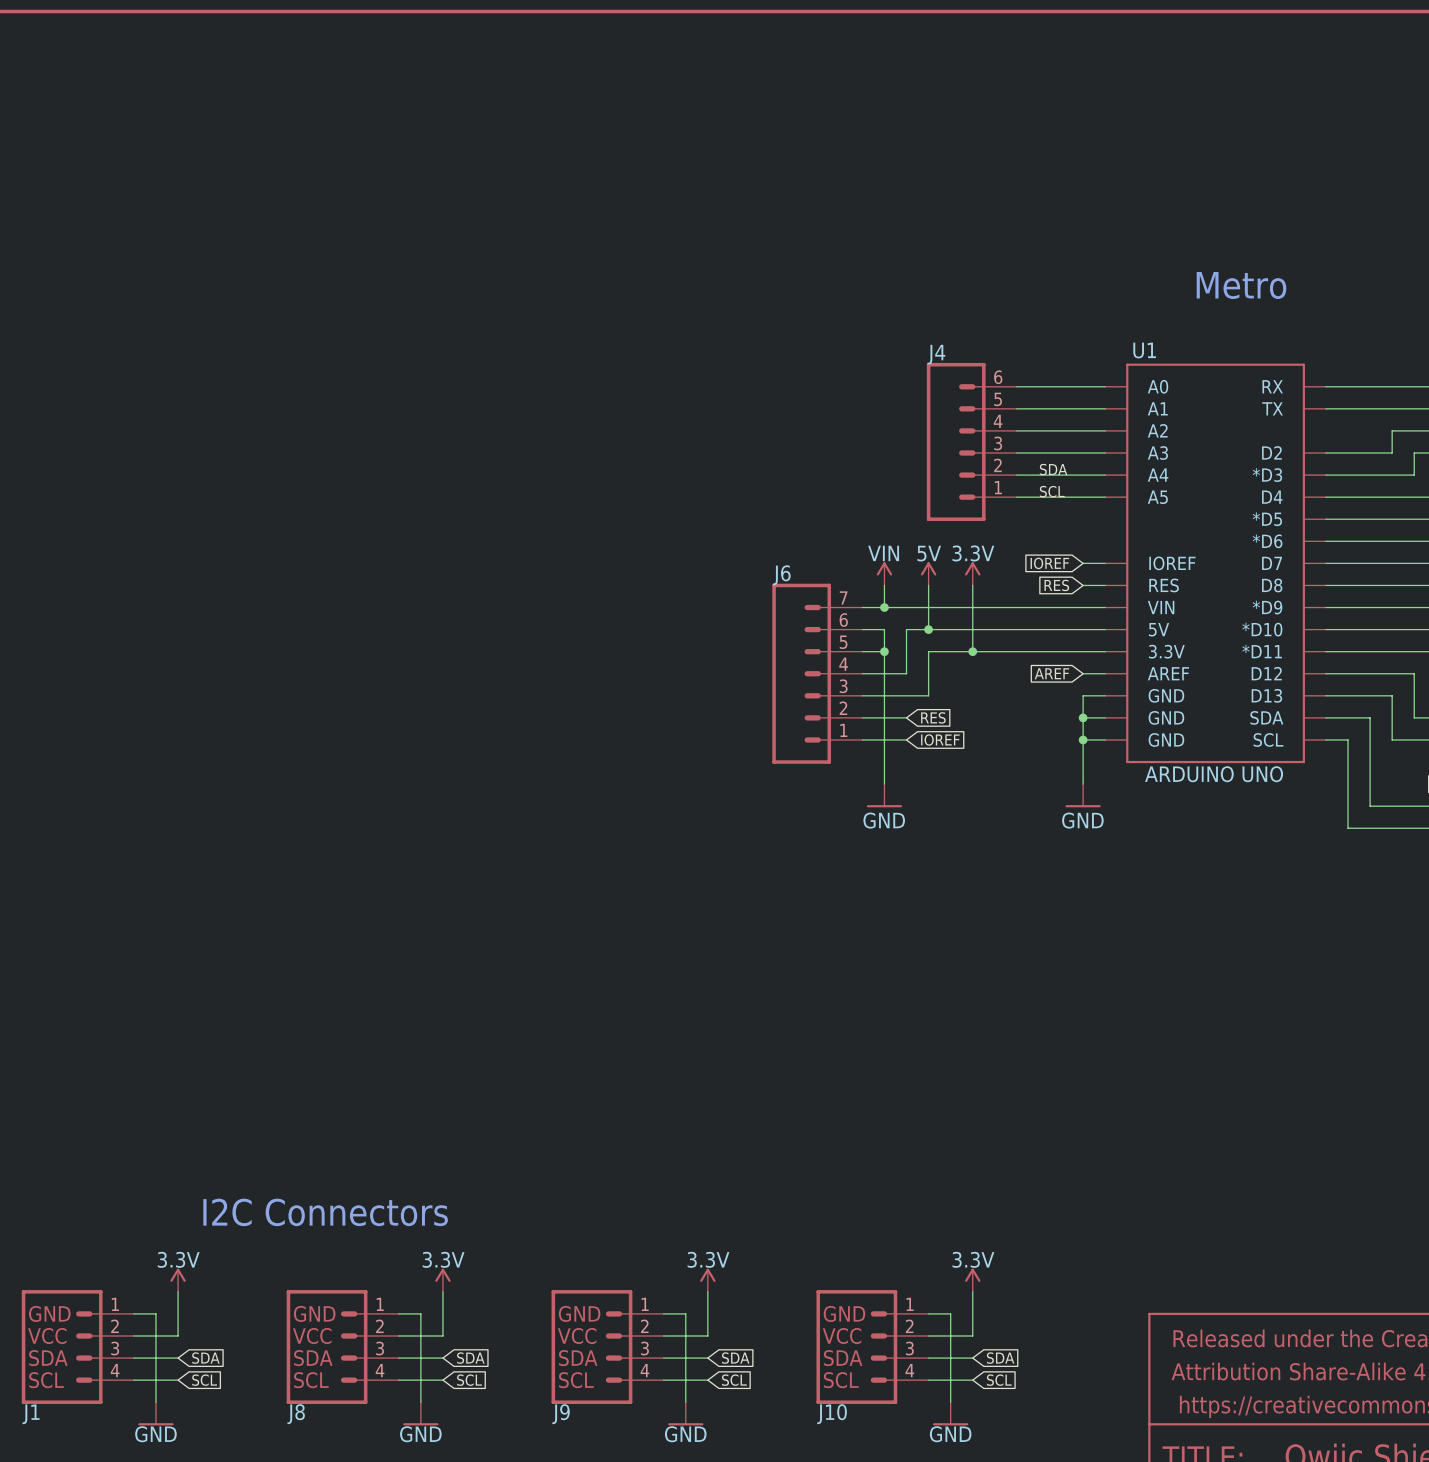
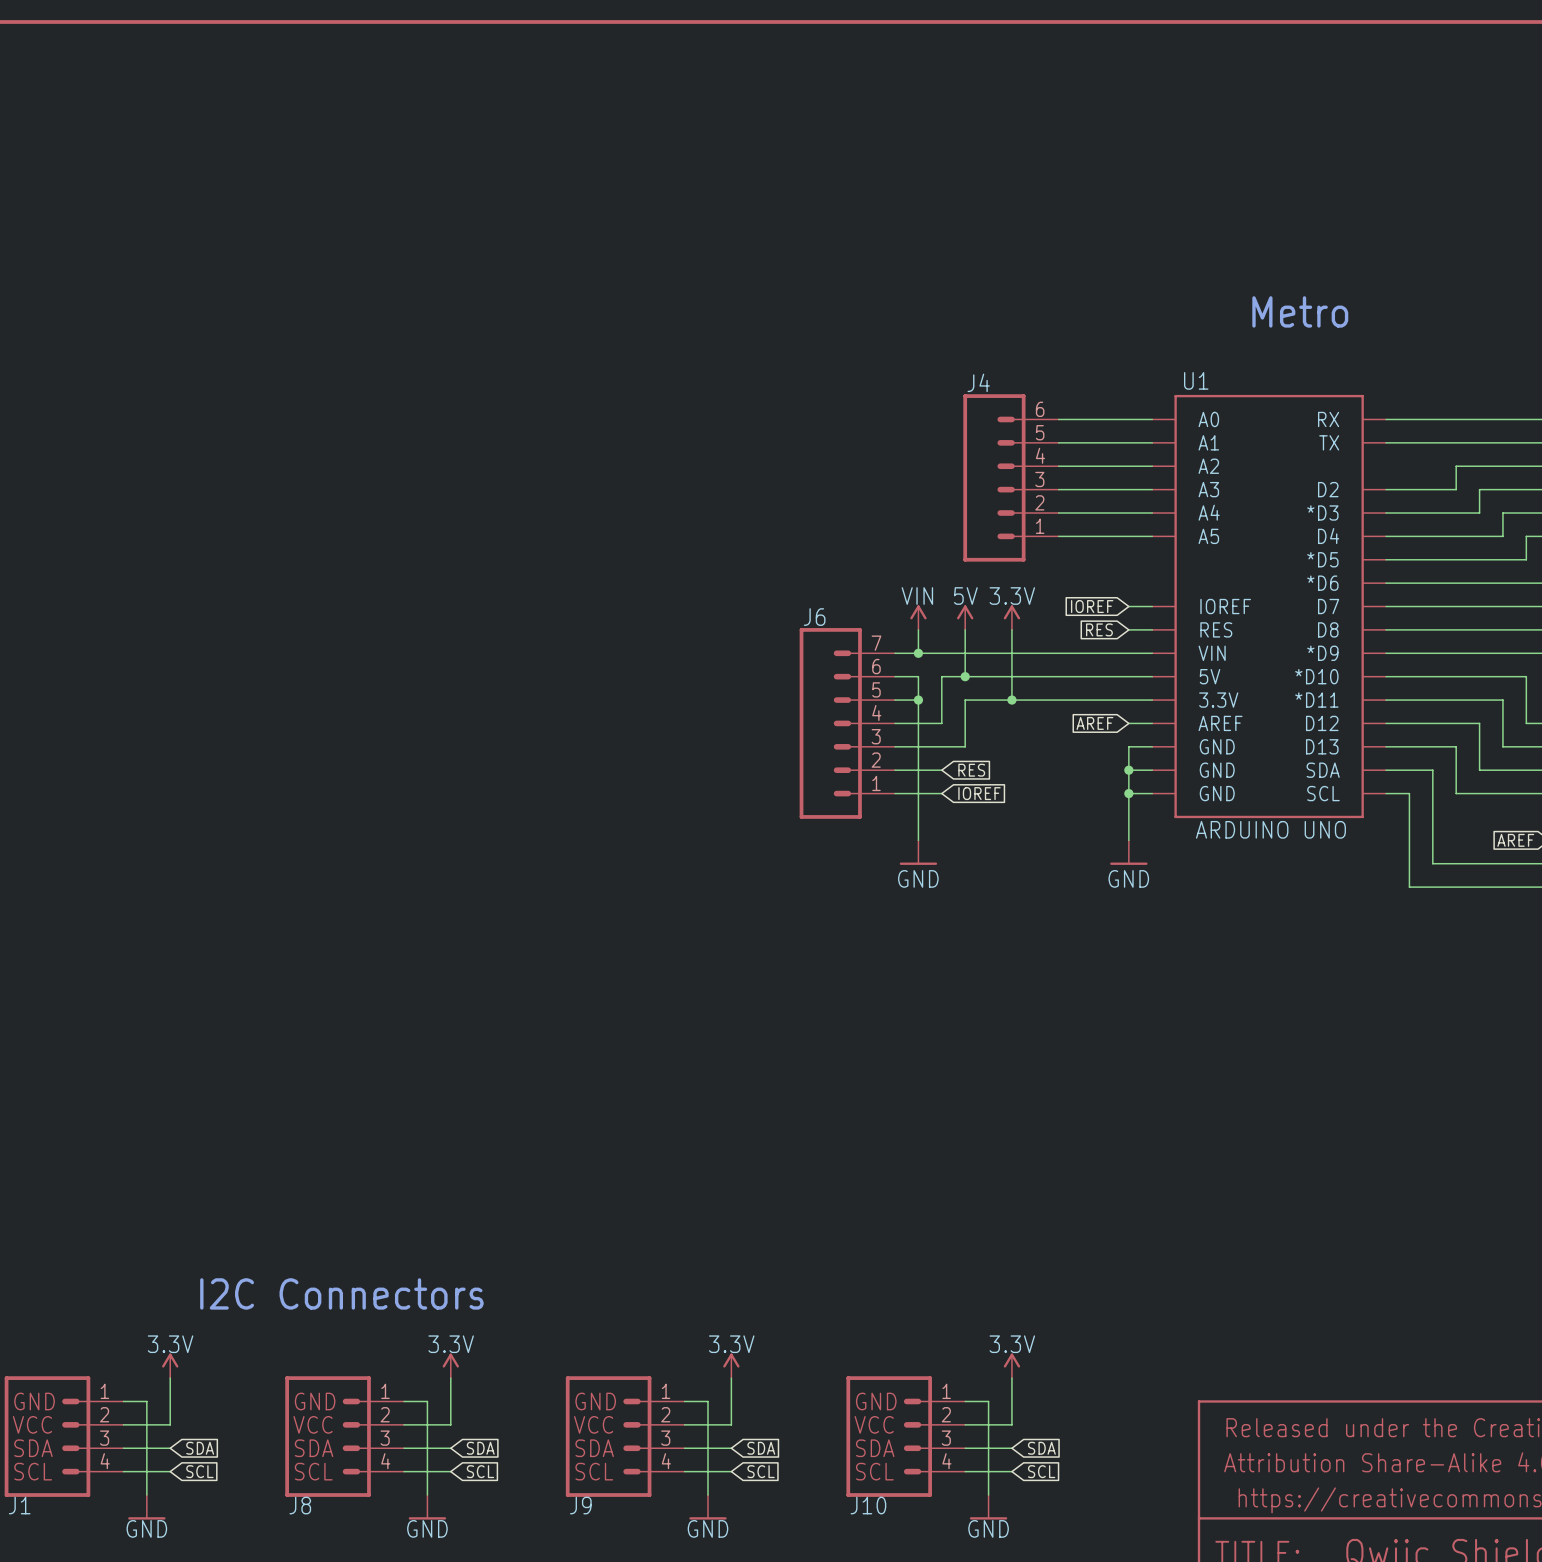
label: SDA (1053, 469) -> none
label: SCL (1052, 491) -> none

